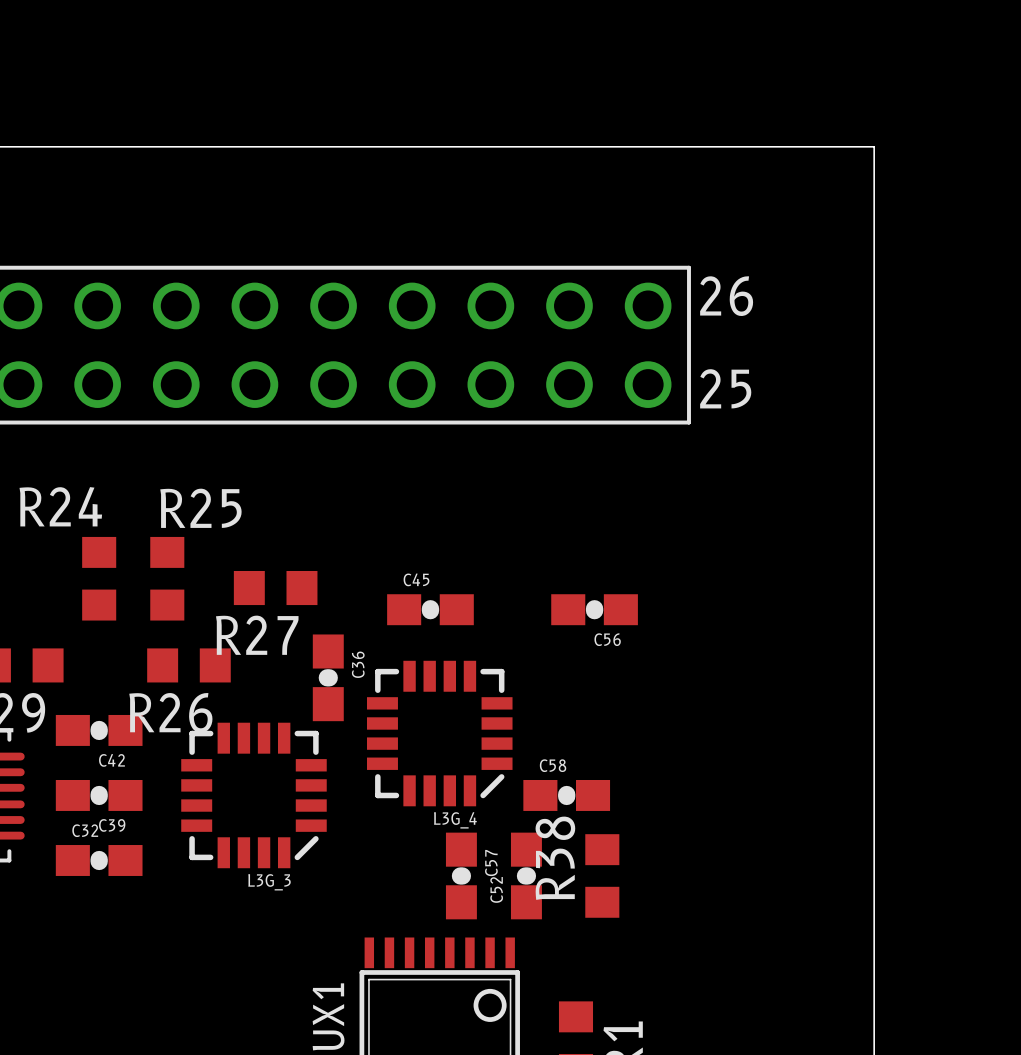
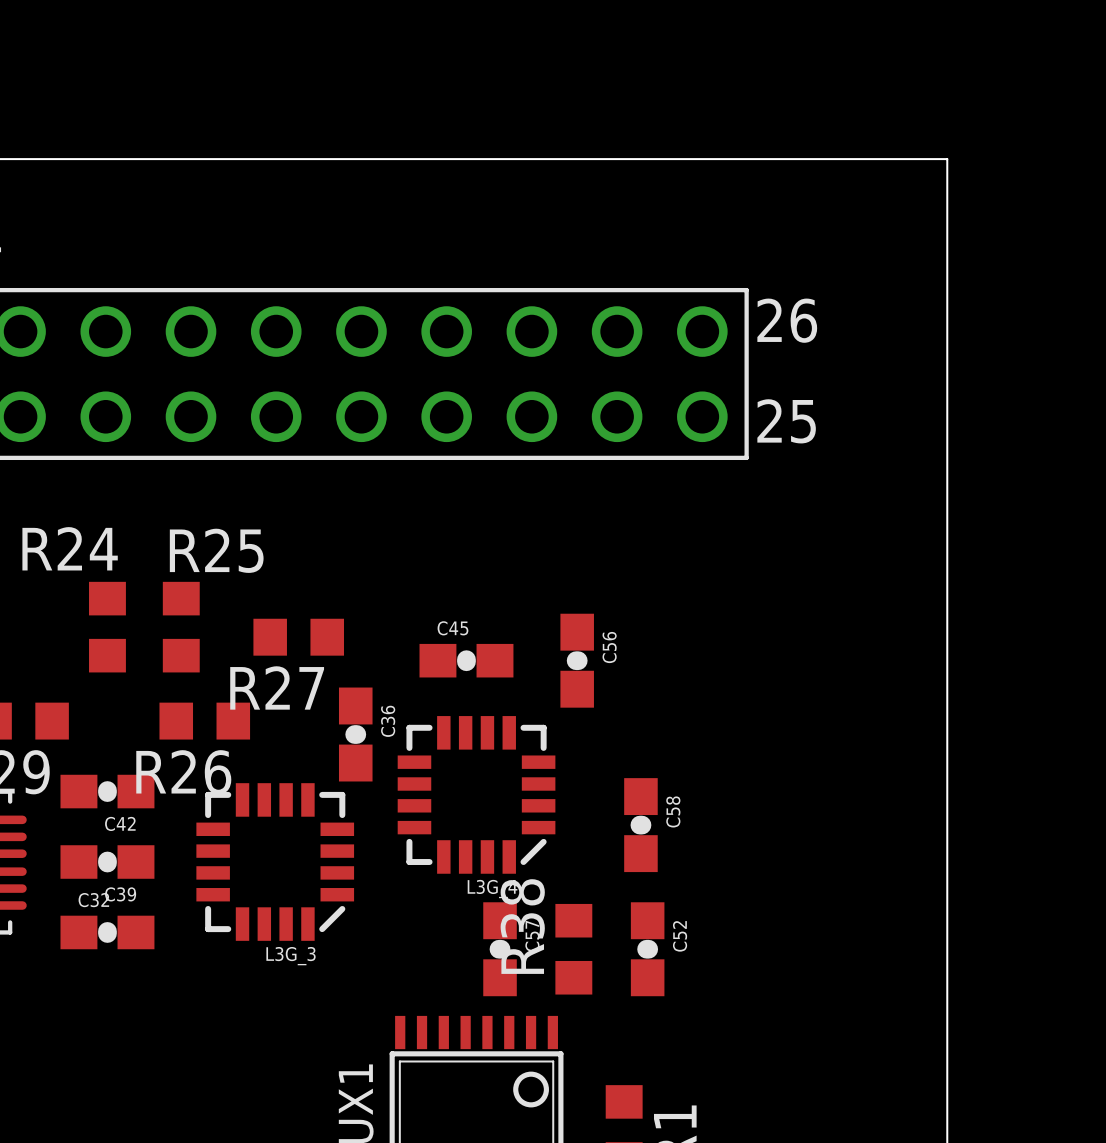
C56 rotation: 0° (594, 609) -> 90° clockwise (577, 660)
C56 position: (594, 609) -> (577, 660)
C58 rotation: 0° (566, 795) -> 90° clockwise (640, 825)
C52 position: (526, 875) -> (647, 949)
R38 position: (602, 875) -> (573, 949)
C52 name position: C52 (496, 889) -> C52 (680, 936)

